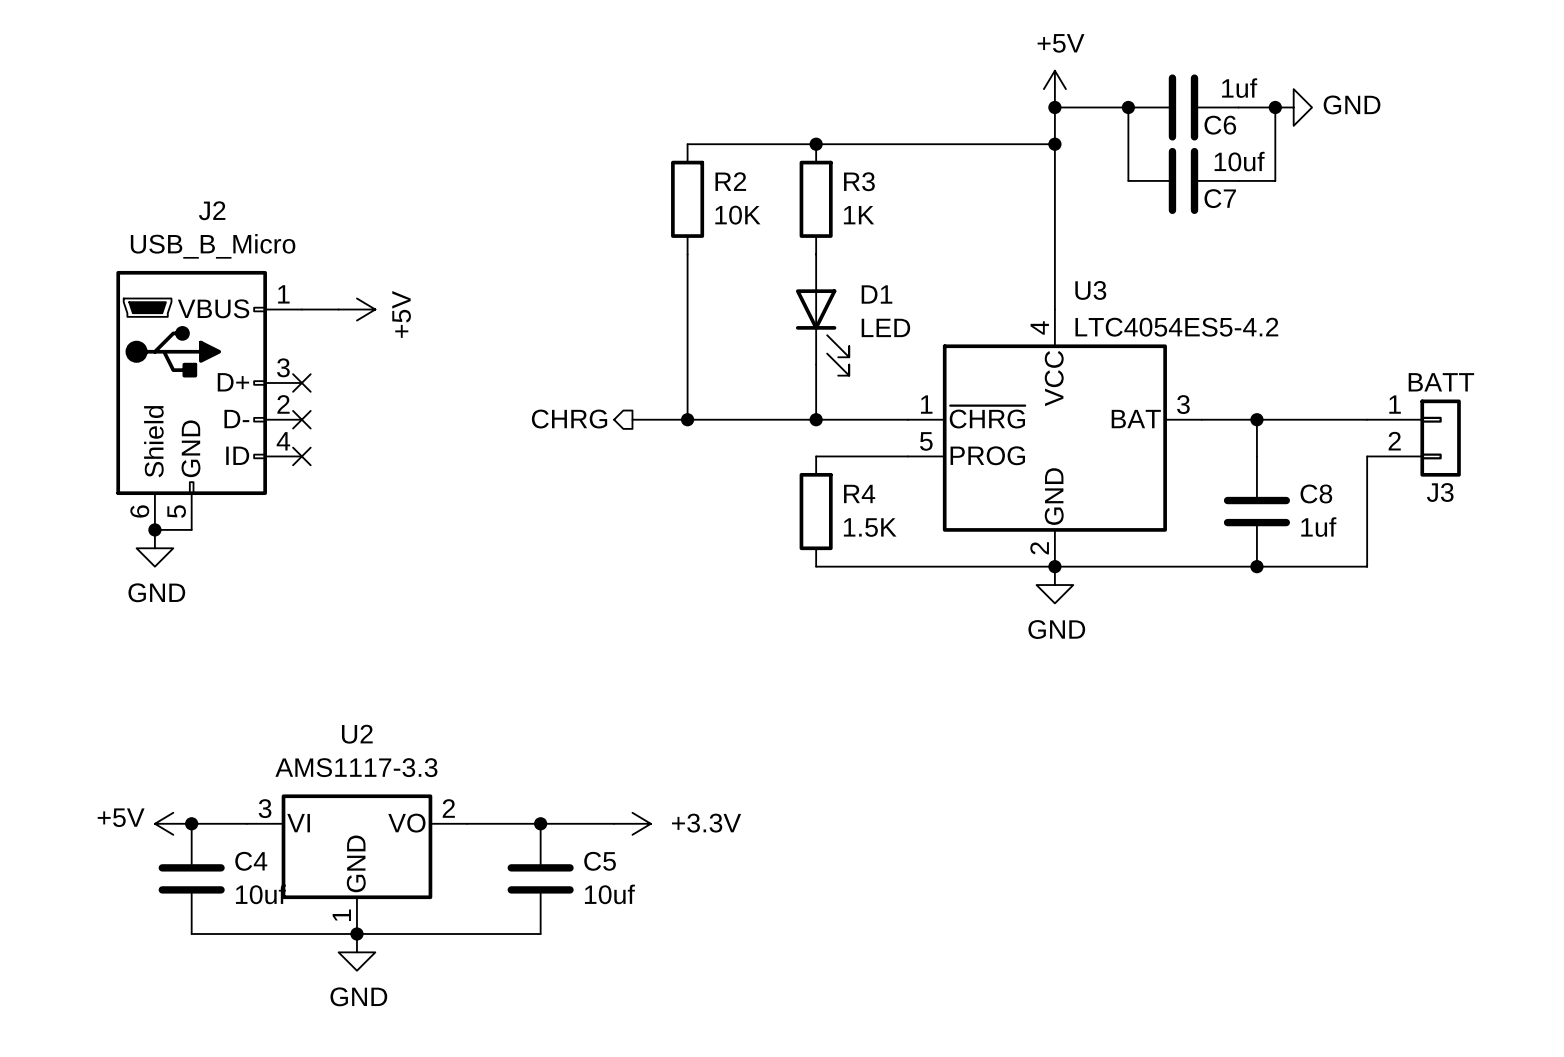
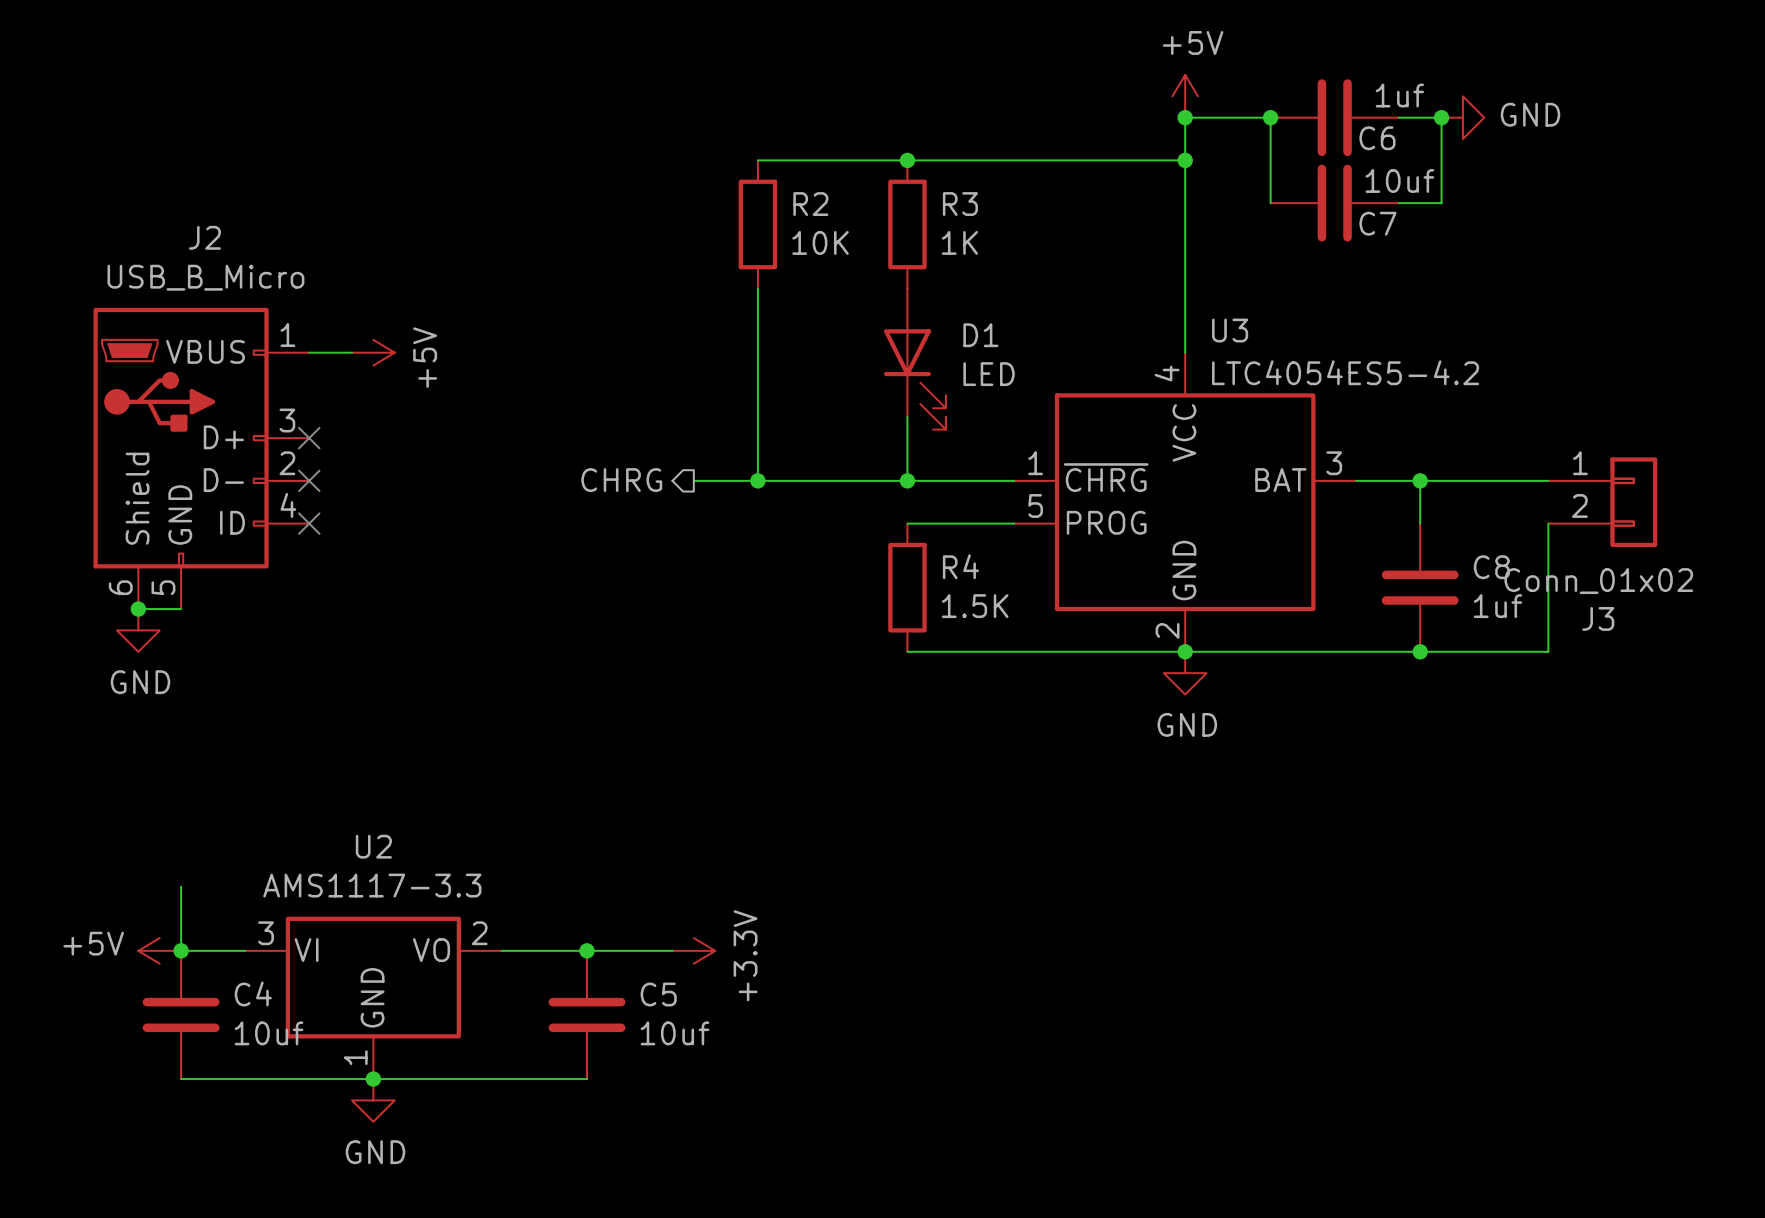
J3 value: BATT (1441, 382) -> Conn_01x02 (1598, 581)
J3 name position: J3 (1440, 492) -> J3 (1598, 618)
wire: none -> (181, 886) (181, 950)
power symbol text rotation: 0° (706, 823) -> 90° counterclockwise (745, 955)

